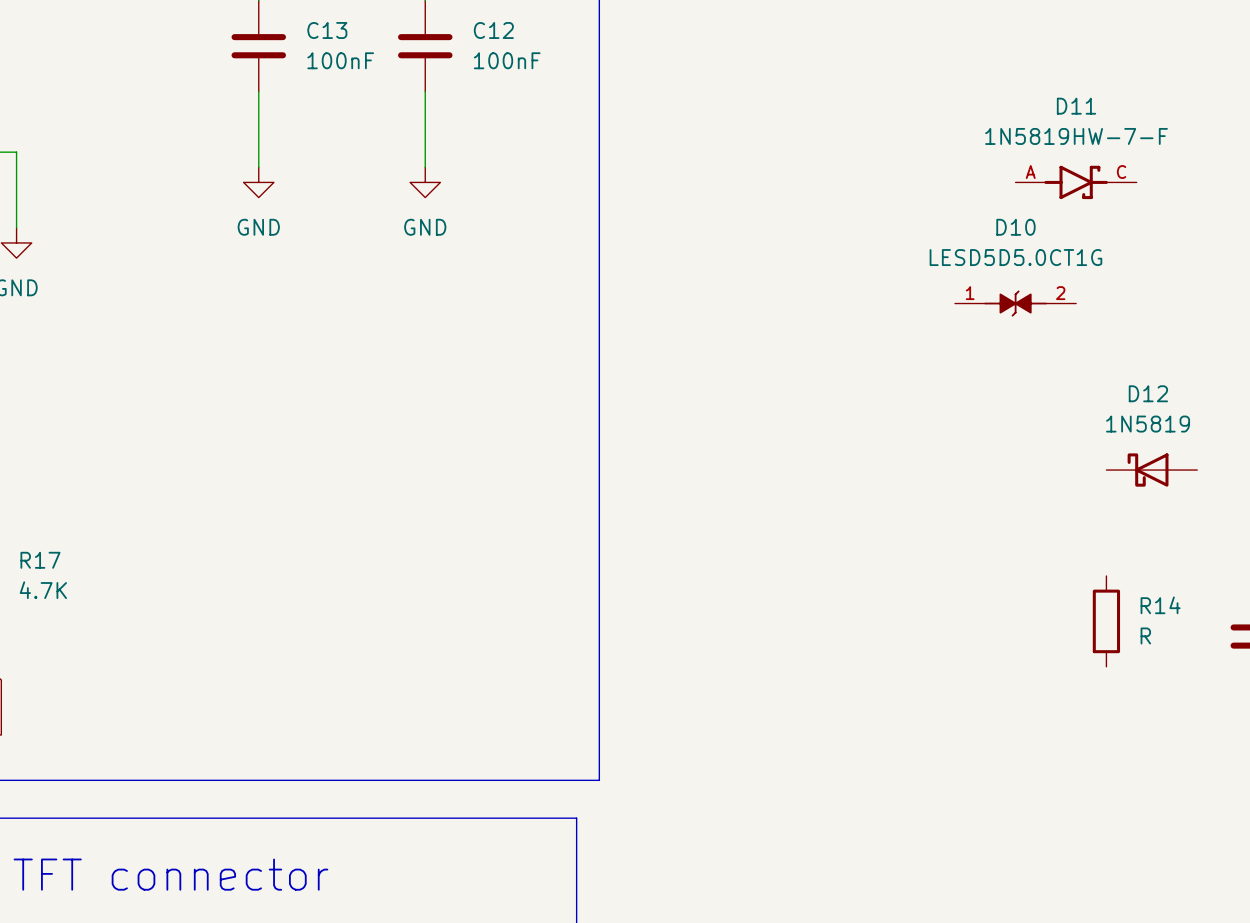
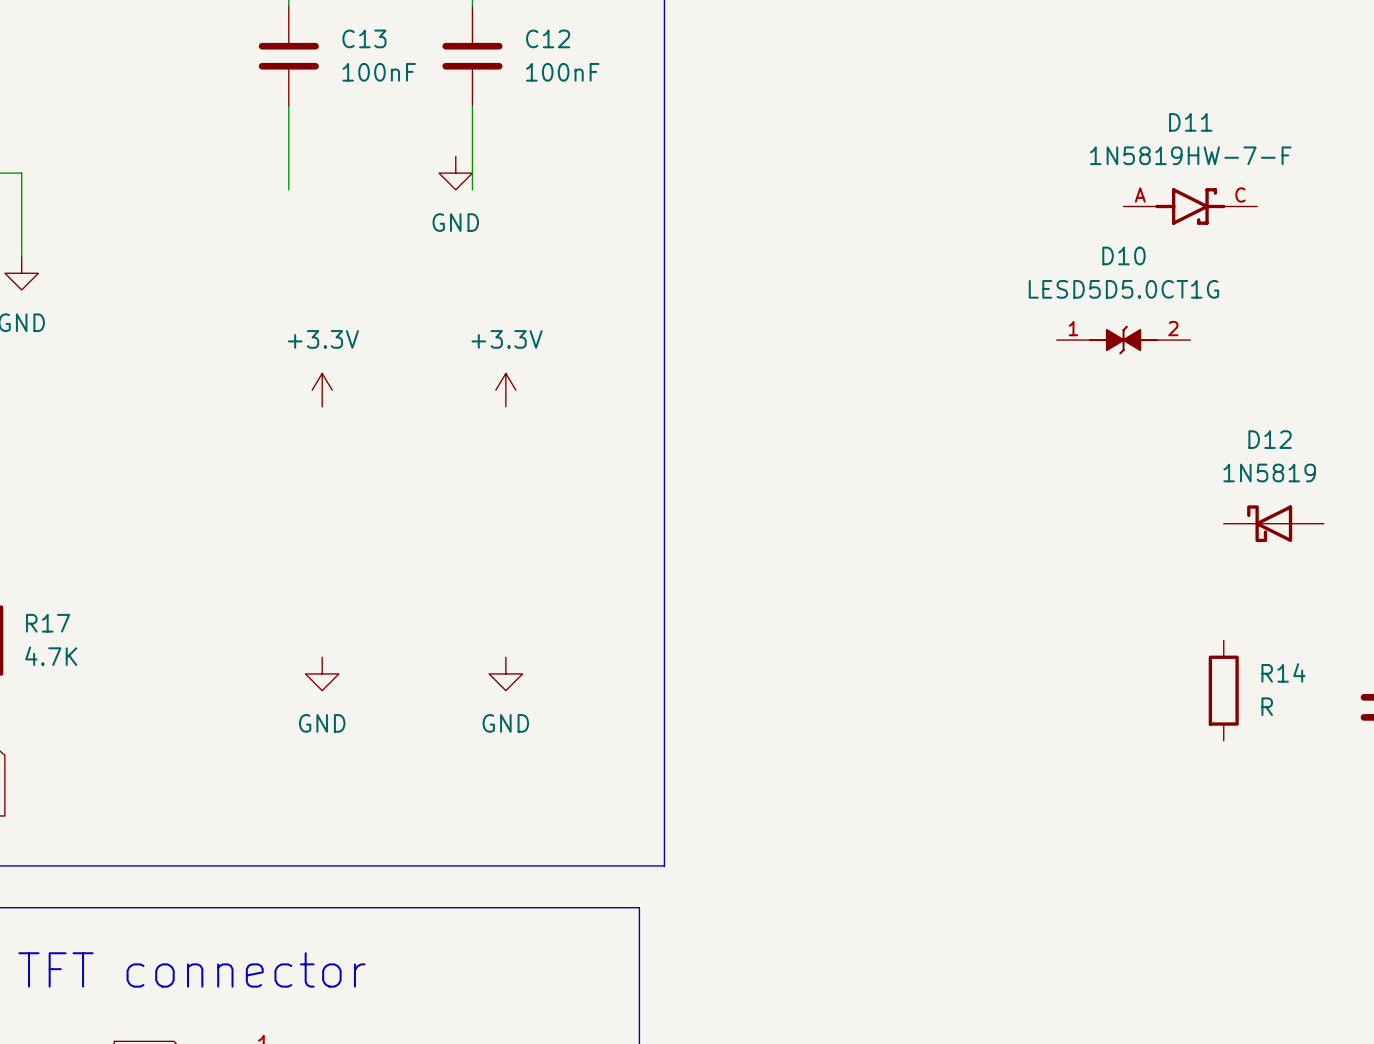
power symbol: GND (258, 182) -> none
power symbol position: GND (425, 182) -> GND (455, 173)
power symbol: none -> +3.3V (322, 390)
power symbol: none -> +3.3V (505, 390)
power symbol: none -> GND (322, 673)
power symbol: none -> GND (505, 673)

